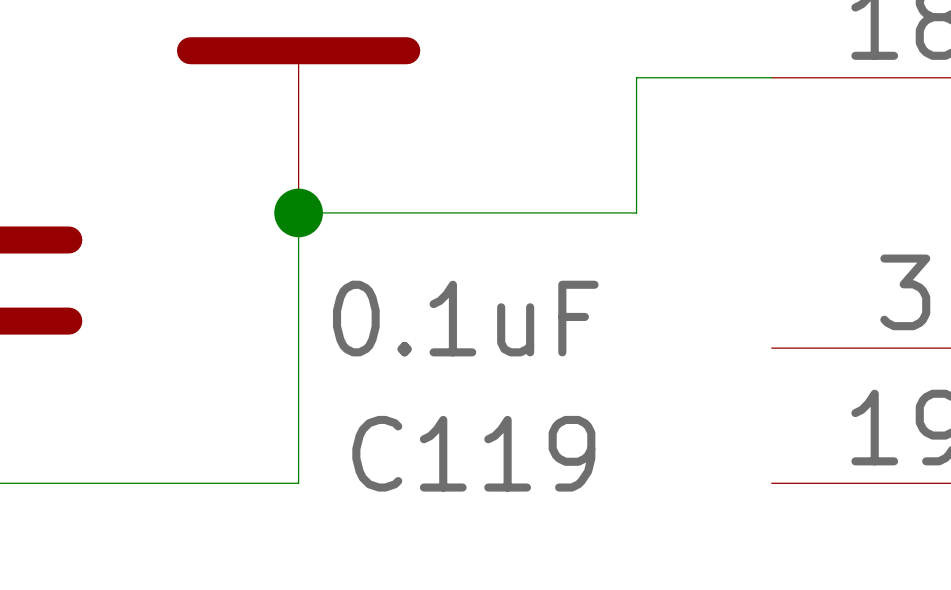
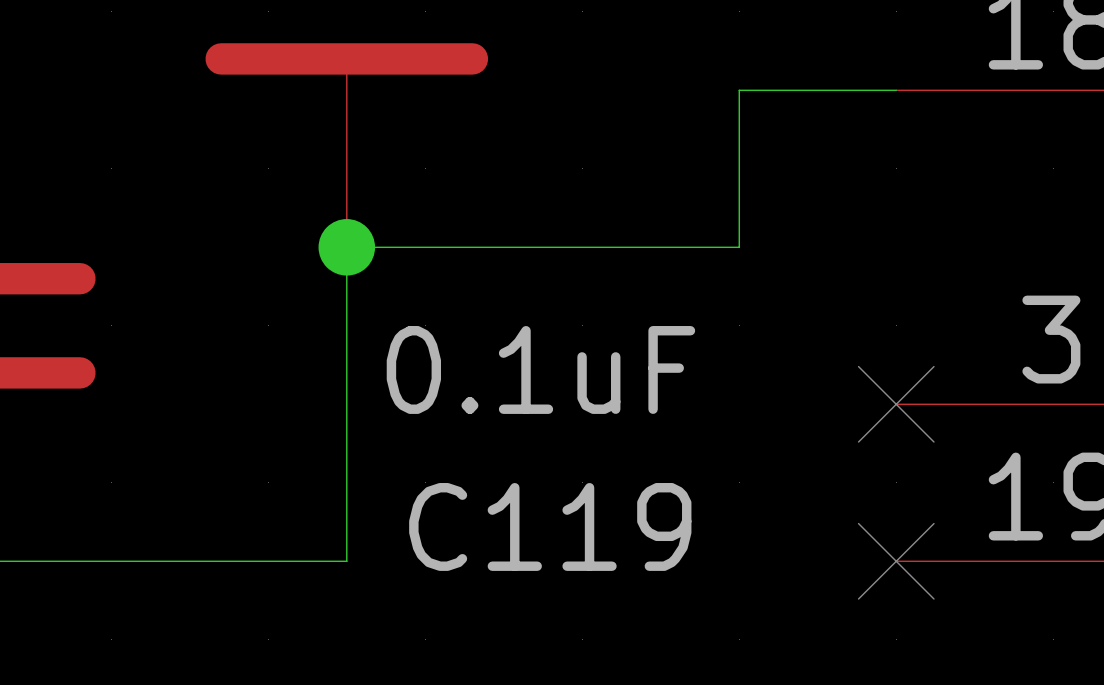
no-connect mark: none -> (896, 404)
no-connect mark: none -> (896, 561)

